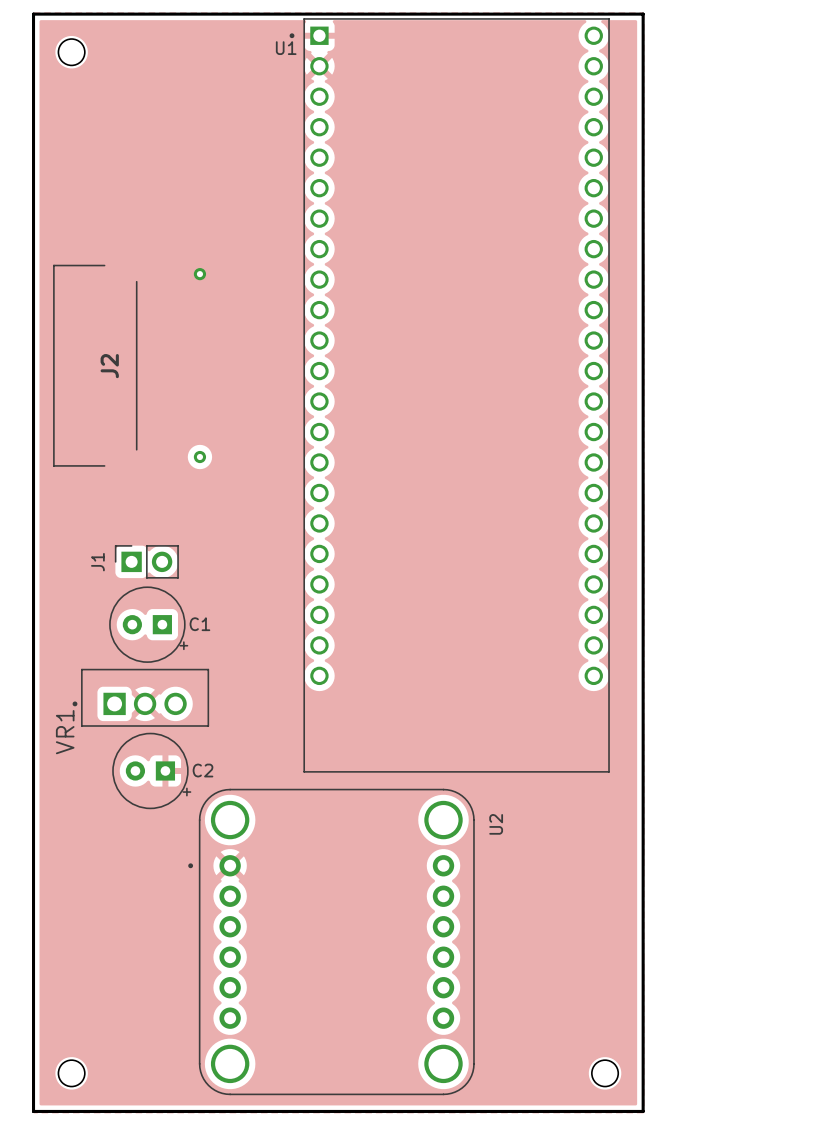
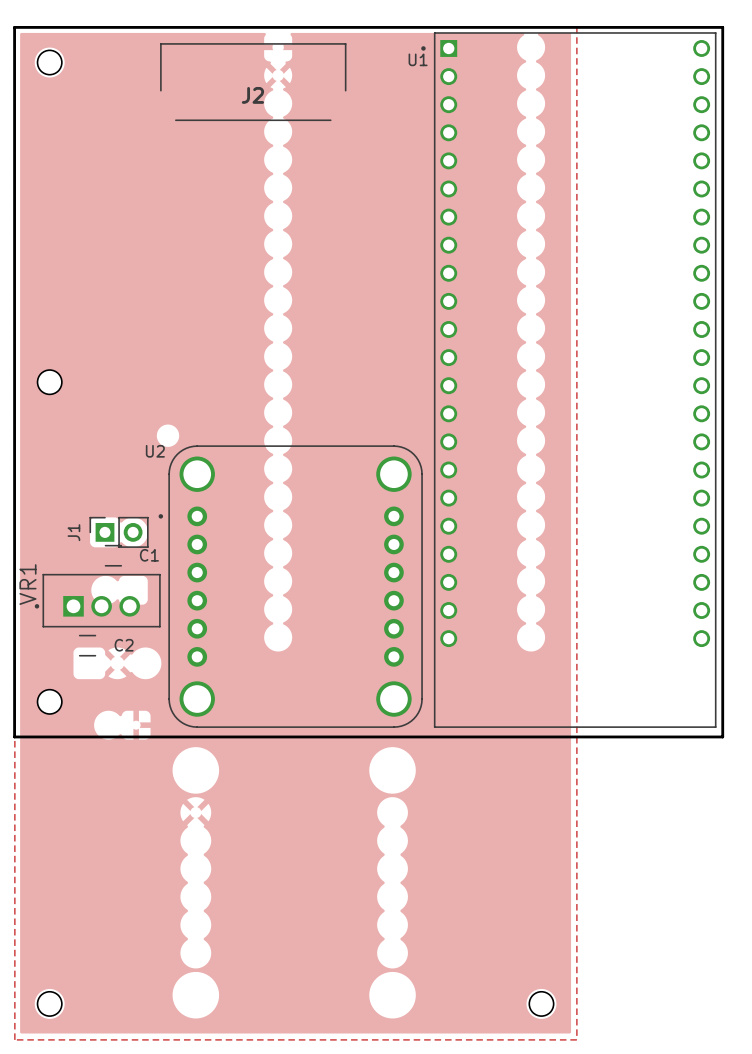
board edge: (643, 14) (643, 1111) (33, 1111) (33, 783) -> (576, 27) (722, 27) (722, 736) (14, 736)
via: (199, 274) -> none
J2 rotation: 0° (95, 365) -> 90° clockwise (253, 82)
J2 position: (95, 365) -> (253, 82)
U1 position: (449, 395) -> (568, 380)
part: none -> (49, 382)
via: (199, 457) -> none
C1 footprint: [109, 586, 189, 663] -> [104, 545, 122, 567]
VR1 position: (140, 697) -> (97, 600)
VR1 name position: VR1 (65, 732) -> VR1 (27, 584)
C2 footprint: [112, 732, 192, 810] -> [79, 634, 97, 657]
part: none -> (49, 701)
U2 name rotation: 0° (496, 824) -> 90° clockwise (155, 451)
U2 name position: U2 (496, 824) -> U2 (155, 451)
U2 position: (331, 941) -> (290, 586)

